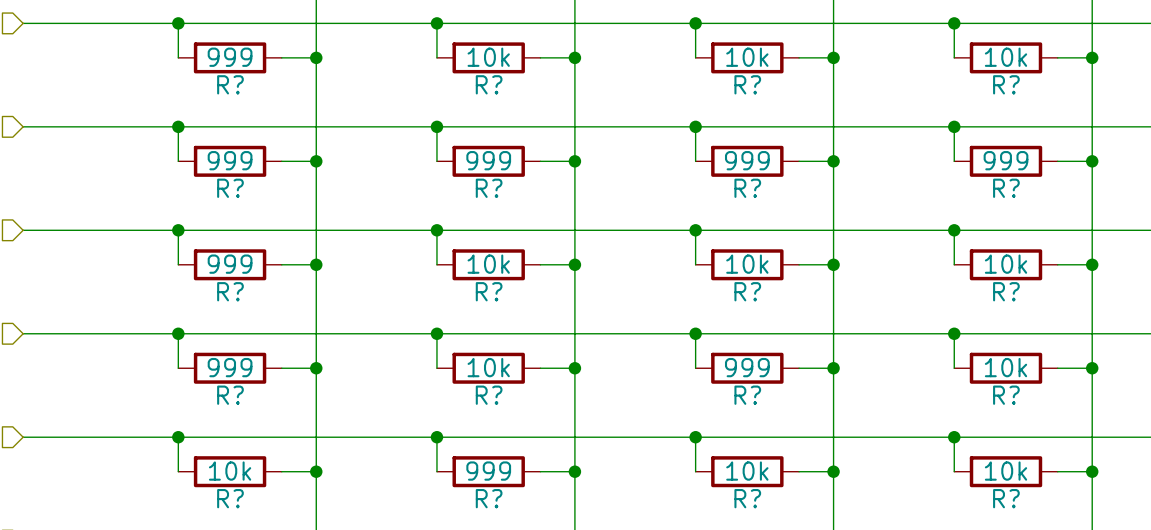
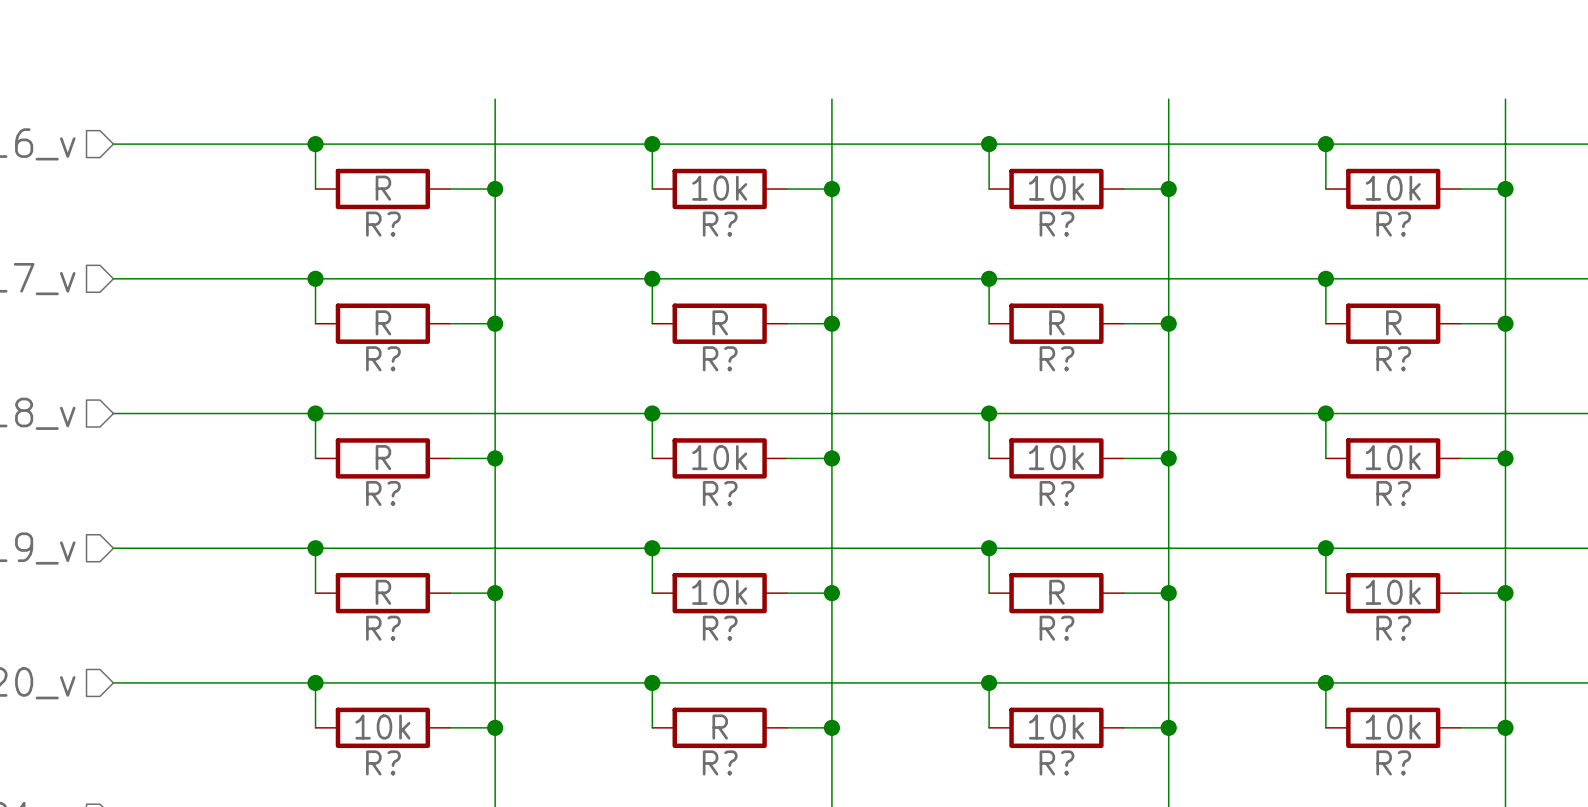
R? value: 999 (230, 57) -> R (383, 188)
R? value: 999 (230, 160) -> R (383, 322)
R? value: 999 (488, 160) -> R (720, 322)
R? value: 999 (747, 160) -> R (1056, 322)
R? value: 999 (1006, 160) -> R (1393, 322)
R? value: 999 (230, 264) -> R (383, 457)
R? value: 999 (230, 367) -> R (383, 592)
R? value: 999 (747, 367) -> R (1056, 592)
R? value: 999 (488, 471) -> R (720, 727)

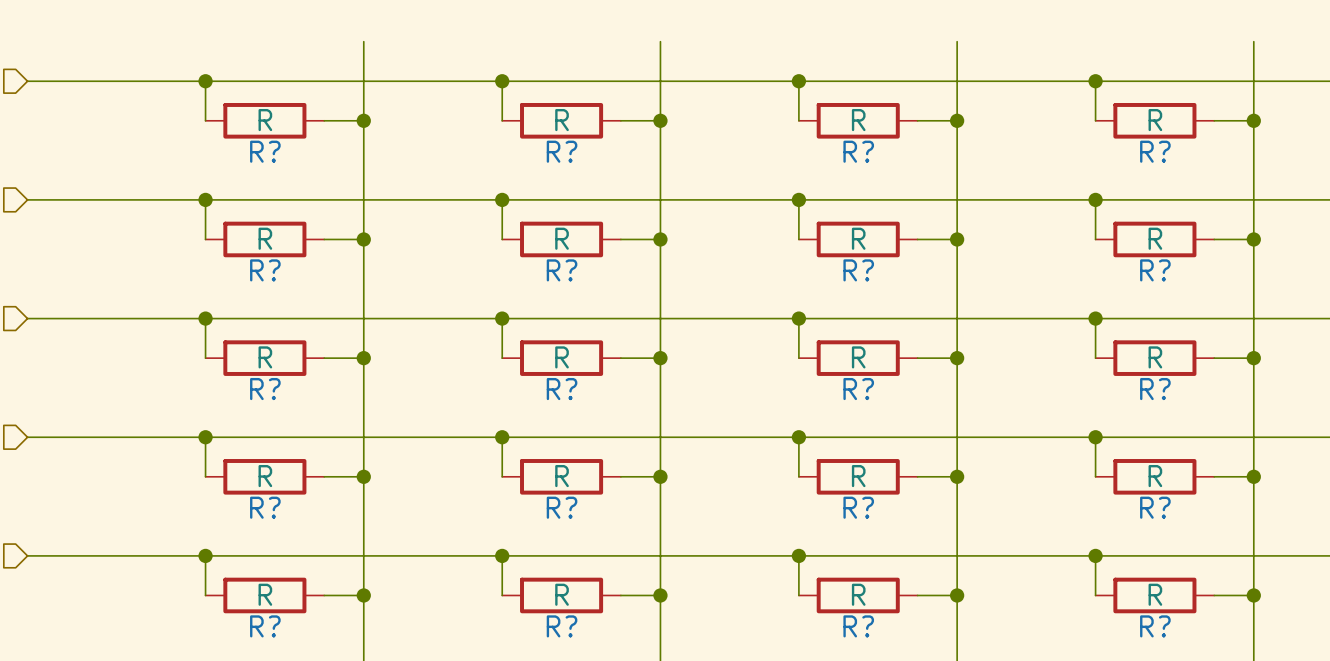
R? value: 10k (719, 188) -> R (562, 120)
R? value: 10k (1056, 188) -> R (858, 120)
R? value: 10k (1393, 188) -> R (1155, 120)
R? value: 10k (719, 457) -> R (562, 357)
R? value: 10k (1056, 457) -> R (858, 357)
R? value: 10k (1393, 457) -> R (1155, 357)
R? value: 10k (719, 592) -> R (562, 476)
R? value: 10k (1393, 592) -> R (1155, 476)
R? value: 10k (382, 727) -> R (265, 594)
R? value: 10k (1056, 727) -> R (858, 594)
R? value: 10k (1393, 727) -> R (1155, 594)

